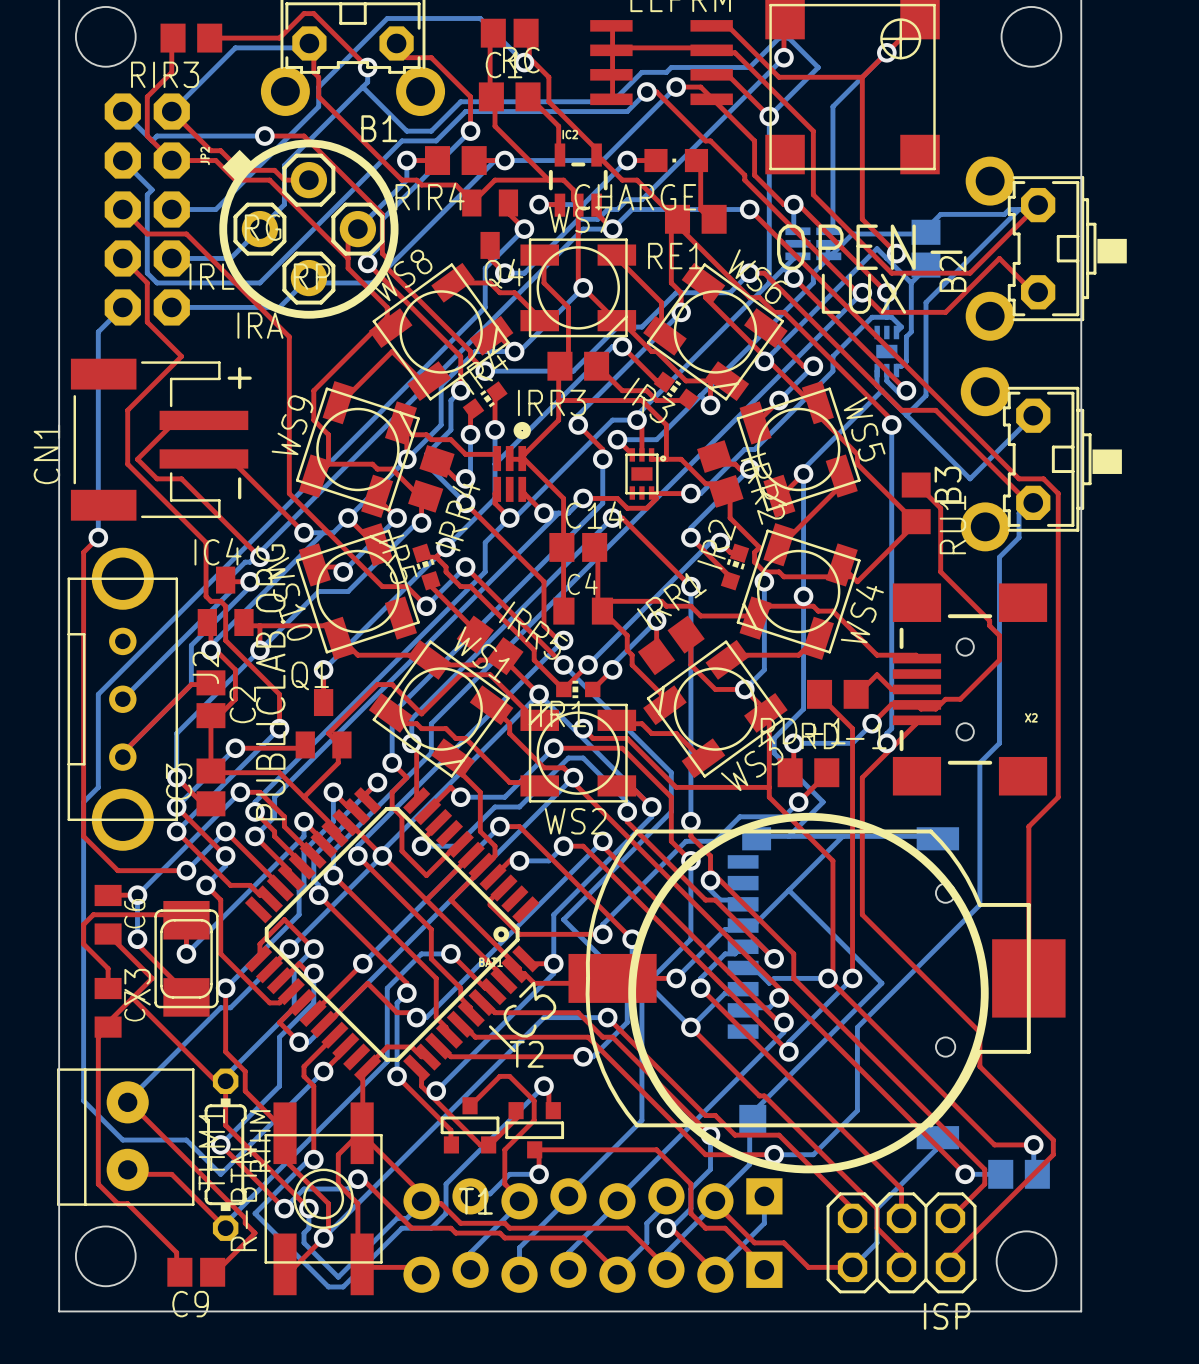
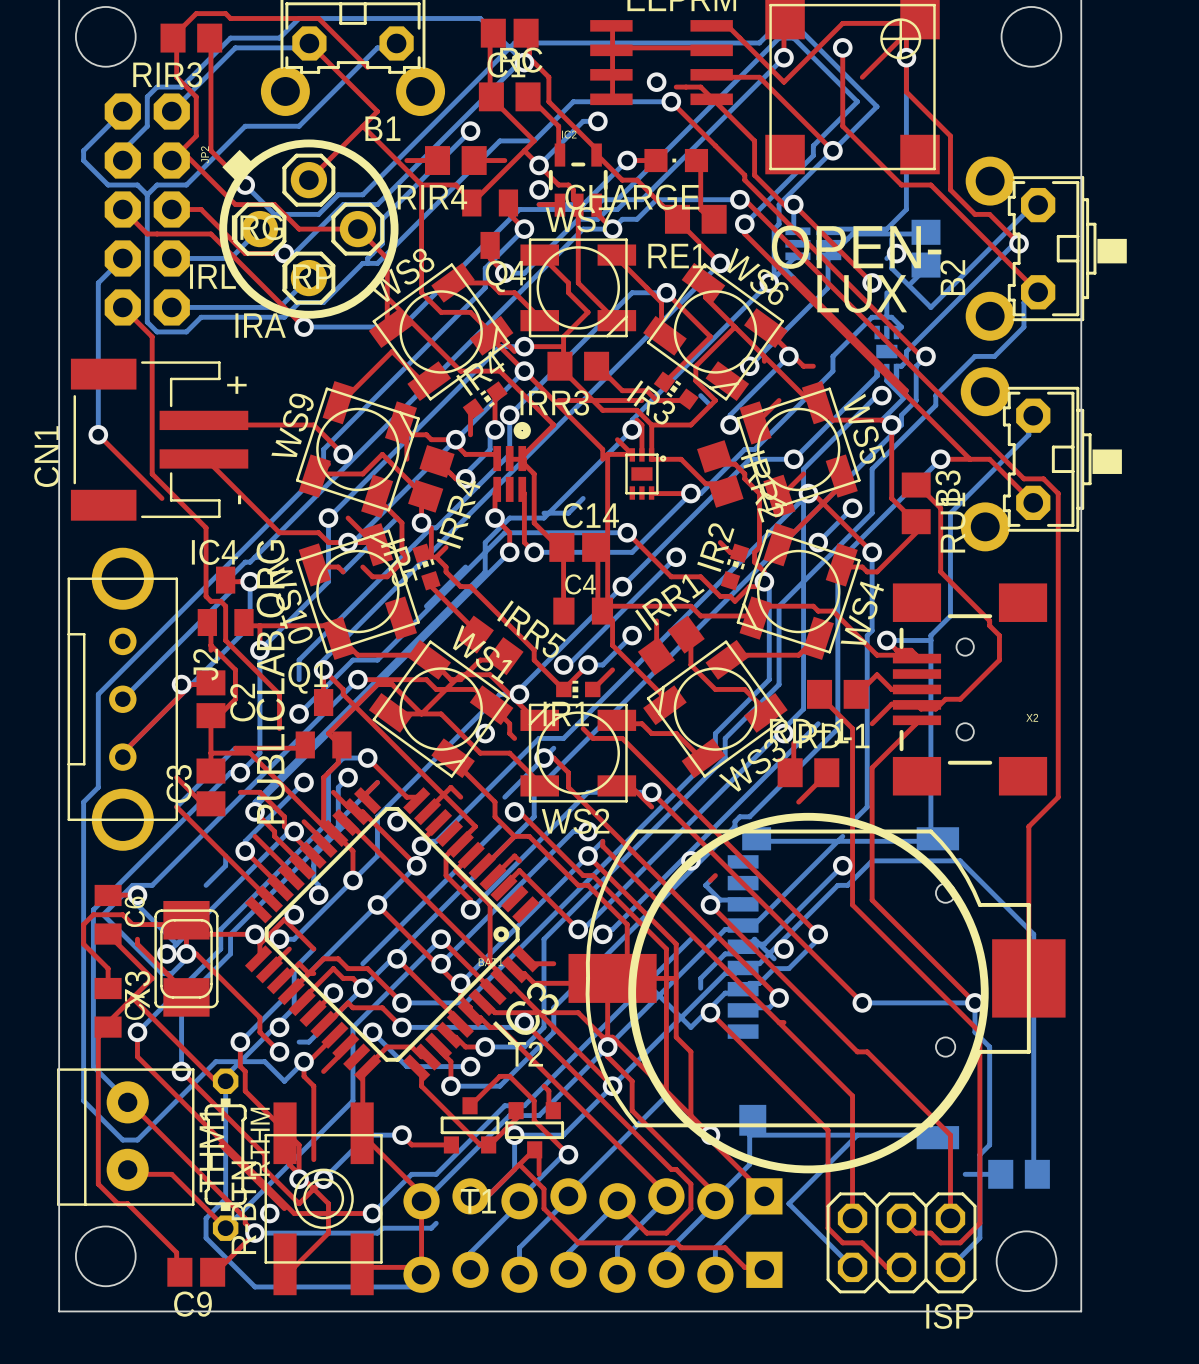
top track: (318, 18) (313, 13) (304, 13) (279, 38) (210, 38) -> (318, 18) (230, 18) (225, 13) (196, 13) (171, 38)
bottom track: (387, 18) (318, 87) (318, 106) -> (396, 43) (392, 47) (377, 47) (318, 106)
top track: none -> (920, 19) (906, 23) (906, 91) (950, 136) (950, 189) (974, 214) (989, 214) (1019, 243)
top track: (171, 38) (171, 72) (147, 96) (147, 136) (171, 160) (215, 160) (235, 180) (269, 180) (348, 258) -> none
top track: none -> (173, 38) (176, 38) (176, 77) (196, 96) (196, 136) (171, 160)
top track: none -> (210, 38) (210, 150) (245, 185)
bottom track: (788, 38) (818, 67) (769, 116) (769, 282) -> (788, 38) (793, 38) (857, 101) (813, 145) (813, 155) (744, 224)
top track: (396, 43) (397, 47) (406, 57) (431, 57) (470, 96) (470, 131) -> none
top track: (313, 47) (313, 72) (318, 77) (318, 96) (401, 180) (416, 180) -> (362, 126) (416, 180)
top track: none -> (842, 47) (842, 126) (901, 185) (930, 185) (1038, 292)
via: none -> (842, 47)
top track: (711, 50) (715, 52) (734, 52) (759, 77) -> (730, 77) (759, 77)
bottom track: (886, 52) (832, 106) (832, 229) -> (906, 57) (906, 209) (886, 229) (832, 229)
via position: (886, 52) -> (906, 57)
bottom track: none -> (519, 62) (377, 204) (343, 204) (294, 253) (284, 253)
bottom track: (367, 67) (367, 82) (284, 165) (284, 204) (274, 214) -> none
via: (367, 67) -> none
bottom track: (749, 67) (671, 67) (666, 72) (641, 72) (612, 101) -> (671, 101) (612, 101)
bottom track: none -> (749, 67) (617, 199) (602, 199) (592, 209) (519, 209) (401, 327) (304, 327)
top track: (730, 77) (769, 116) -> none
top track: (779, 77) (862, 77) (862, 219) (896, 253) -> (779, 77) (783, 82) (842, 23) (916, 23)
via: none -> (656, 82)
bottom track: (362, 87) (406, 131) (431, 131) (460, 101) (573, 101) -> none
bottom track: (676, 87) (602, 160) (495, 160) (372, 282) (313, 282) (308, 278) -> none
via: (676, 87) -> none
top track: (646, 91) (656, 91) (705, 140) (710, 140) -> (671, 101) (710, 140)
bottom track: (646, 91) (627, 111) (465, 111) (436, 140) (401, 140) (259, 282) (157, 282) (147, 273) -> (573, 101) (534, 140) (499, 140) (377, 263) (362, 263) (323, 302) (299, 302) (284, 317) (201, 317) (186, 331) (157, 331) (147, 322) (147, 273)
via: (646, 91) -> none
top track: none -> (490, 96) (534, 140) (495, 180)
top track: (495, 96) (495, 126) (548, 180) -> none
via: none -> (671, 101)
bottom track: (122, 111) (152, 140) (157, 136) (264, 136) -> (122, 111) (83, 150) (83, 160) (108, 185) (137, 185) (147, 194)
top track: (171, 111) (210, 150) (220, 150) (240, 170) (274, 170) (284, 180) (308, 180) -> (313, 47) (377, 111) (308, 180)
via: (769, 116) -> none
bottom track: none -> (597, 121) (583, 121) (539, 165)
via: none -> (597, 121)
bottom track: (299, 126) (215, 209) (171, 209) -> (299, 126) (245, 126) (186, 185) (157, 185) (152, 189)
top track: (813, 131) (813, 194) (891, 273) (970, 273) (1038, 205) -> (813, 131) (832, 150)
top track: (264, 136) (304, 136) (382, 214) (382, 253) -> (181, 150) (235, 204) (274, 204) (299, 229) (357, 229) (382, 253)
via position: (264, 136) -> (245, 185)
via: none -> (832, 150)
bottom track: (122, 160) (152, 189) -> (122, 160) (122, 150) (147, 126) (147, 96) (157, 87) (181, 87) (230, 38) (279, 38) (299, 18) (387, 18)
bottom track: (406, 160) (406, 180) (357, 229) -> none
via: (406, 160) -> none
via: (504, 160) -> none
via: none -> (539, 165)
top track: (495, 180) (563, 180) (568, 185) -> (524, 150) (558, 185) (568, 185)
bottom track: none -> (245, 185) (274, 214) (318, 214) (338, 194) (362, 194) (514, 42) (759, 42) (774, 28) (798, 28) (877, 106) (779, 204) (779, 224) (774, 229) (774, 278)
top track: none -> (421, 185) (421, 292) (441, 312) (470, 312) (490, 331) (490, 336) (578, 424)
via: none -> (739, 199)
via position: (539, 204) -> (539, 189)
top track: (783, 204) (798, 204) (886, 292) -> (783, 204) (788, 209) (798, 209) (872, 282)
bottom track: (1038, 205) (1033, 209) (1009, 209) (1004, 214) (940, 214) (926, 229) (926, 232) -> (1038, 205) (1033, 204) (930, 307) (891, 268) (891, 238)
top track: none -> (171, 209) (201, 209) (245, 253) (284, 253)
top track: (749, 209) (1019, 478) (1023, 478) -> (739, 199) (744, 199) (1023, 478)
bottom track: (749, 209) (632, 209) (622, 219) -> (739, 199) (656, 199) (637, 219) (622, 219)
via: (749, 209) -> none
bottom track: (1019, 209) (926, 302) (926, 395) (906, 415) -> none
top track: (676, 219) (671, 219) (749, 297) (759, 297) (774, 312) (783, 312) (891, 420) (891, 424) -> (676, 219) (720, 263)
top track: (677, 219) (671, 214) (671, 282) (681, 292) (681, 312) -> none
top track: none -> (744, 224) (744, 233) (970, 459)
via: none -> (744, 224)
top track: (357, 229) (348, 238) (348, 268) (387, 307) -> (387, 268) (387, 307)
top track: (186, 233) (289, 336) (289, 493) (362, 567) -> (186, 233) (210, 233) (304, 327)
via: none -> (1019, 243)
via: none -> (284, 253)
top track: (122, 258) (147, 282) (147, 322) (181, 356) (127, 410) (127, 464) -> (98, 434) (127, 464)
top track: (543, 258) (543, 282) (568, 307) (568, 361) (563, 366) -> (543, 258) (568, 282) (568, 292) (588, 312) (563, 336) (563, 366)
bottom track: (828, 258) (813, 273) (813, 282) (656, 439) (617, 439) -> (828, 258) (828, 287) (749, 366)
top track: (367, 263) (460, 356) (460, 390) -> none
via: (367, 263) -> none
bottom track: none -> (720, 263) (318, 664)
via: none -> (720, 263)
top track: (387, 268) (470, 351) (470, 356) (485, 371) -> none
top track: (749, 273) (764, 273) (901, 410) (935, 410) (1028, 503) (1033, 502) -> (940, 459) (989, 459) (1033, 502)
bottom track: (749, 273) (730, 292) (676, 292) (641, 327) (617, 327) (573, 371) (485, 371) -> none
via: (749, 273) -> none
via: (793, 278) -> none
via: none -> (769, 282)
via: none -> (872, 282)
bottom track: (485, 287) (485, 307) (323, 469) -> (485, 287) (323, 449) (323, 469)
bottom track: (583, 287) (519, 351) (475, 351) (441, 385) (441, 424) (333, 532) (304, 532) -> none
via: (583, 287) -> none
bottom track: none -> (666, 292) (632, 292) (509, 415) (509, 454) (436, 527) (431, 527) (299, 660) (299, 679)
bottom track: (862, 292) (431, 723) (431, 753) (333, 851) (333, 875) -> none
via: (862, 292) -> none
via: (886, 292) -> none
top track: (1038, 292) (1033, 292) (999, 258) (945, 312) (881, 312) (862, 292) (857, 292) -> (926, 356) (921, 356) (857, 292)
top track: none -> (387, 297) (460, 371) (499, 371) (553, 424)
bottom track: (122, 307) (98, 331) -> (122, 258) (98, 282) (98, 331)
bottom track: (681, 312) (578, 415) (578, 424) -> none
via position: (681, 312) -> (666, 292)
top track: (387, 317) (313, 390) (313, 420) (328, 434) (328, 464) -> none
top track: (616, 320) (617, 317) (651, 351) (656, 351) (686, 380) (725, 380) (727, 381) (710, 380) (710, 405) -> none
via: none -> (304, 327)
top track: none -> (734, 327) (695, 366) (695, 380) (715, 400) (690, 424) (651, 424)
top track: none -> (524, 346) (563, 346)
via: none -> (524, 346)
top track: (622, 346) (656, 380) (664, 382) -> (666, 292) (710, 336) (664, 382)
bottom track: (622, 346) (612, 346) (495, 464) -> none
via: (622, 346) -> none
via: (514, 351) -> none
bottom track: (906, 351) (906, 336) (911, 331) (911, 282) (877, 248) (764, 361) -> (906, 351) (1014, 243) (1019, 243)
via: none -> (788, 356)
via: none -> (926, 356)
via position: (764, 361) -> (749, 366)
top track: (558, 366) (558, 420) (553, 424) -> (558, 366) (602, 410) (637, 410) (651, 424)
bottom track: (813, 366) (779, 400) -> (852, 508) (818, 542)
via: (813, 366) -> none
via: (485, 371) -> none
bottom track: none -> (524, 371) (352, 542) (348, 542)
via: none -> (524, 371)
bottom track: none -> (896, 371) (896, 385) (906, 395) (881, 420)
bottom track: (877, 376) (877, 385) (970, 478) (1028, 420) -> (877, 376) (793, 459) (749, 459) (514, 694)
bottom track: (460, 390) (450, 400) (450, 429) (426, 454) (426, 464) (465, 503) -> none
via: (460, 390) -> none
via: (906, 390) -> none
via: none -> (881, 395)
top track: (641, 400) (666, 424) (666, 459) -> none
via: (779, 400) -> none
via: (710, 405) -> none
top track: (818, 405) (818, 415) (857, 454) (857, 464) (891, 498) -> (818, 405) (832, 420) (881, 420) (891, 429) (891, 498)
via: none -> (509, 415)
bottom track: (637, 415) (637, 420) (612, 420) (514, 518) -> (637, 415) (632, 420) (632, 429) (543, 518) (514, 518)
top track: (203, 420) (201, 424) (171, 424) (137, 459) (152, 473) -> (122, 307) (152, 336) (152, 473)
top track: none -> (203, 420) (206, 424) (313, 424) (343, 454)
via: (637, 420) -> none
via: (578, 424) -> none
top track: none -> (651, 424) (651, 454)
via: none -> (730, 424)
bottom track: (891, 424) (891, 728) (886, 733) (886, 743) -> none
bottom track: none -> (490, 429) (490, 449) (465, 473)
bottom track: (495, 429) (495, 498) (323, 669) -> none
via: none -> (632, 429)
bottom track: (98, 434) (98, 537) -> none
via: none -> (98, 434)
bottom track: (470, 434) (470, 473) (465, 478) -> none
via position: (470, 434) -> (455, 439)
via: (617, 439) -> none
via: none -> (343, 454)
top track: (206, 459) (230, 459) (304, 532) -> (206, 459) (279, 532) (318, 532) (328, 542) (372, 542)
via: (406, 459) -> none
top track: (524, 459) (563, 498) (563, 547) -> (524, 459) (524, 464) (534, 473) (534, 522) (558, 547) (561, 547)
bottom track: (602, 459) (602, 503) (392, 713) (392, 762) -> none
via: (602, 459) -> none
via: none -> (793, 459)
via: none -> (940, 459)
top track: (328, 464) (372, 464) (377, 469) (392, 469) (416, 493) (421, 493) -> (318, 473) (362, 473) (382, 454) (421, 493)
bottom track: (749, 469) (690, 527) (690, 537) -> (788, 356) (730, 415) (730, 424)
via: (749, 469) -> none
via: (803, 473) -> none
top track: (157, 478) (181, 478) (259, 557) -> none
bottom track: none -> (695, 488) (632, 552) (534, 552)
top track: (725, 491) (730, 493) (730, 518) (759, 547) -> (739, 469) (744, 473) (744, 478) (759, 493) (759, 547)
top track: (524, 493) (543, 513) -> (524, 493) (524, 542) (534, 552)
top track: (651, 493) (656, 498) (646, 508) (627, 508) (617, 498) (583, 498) -> none
top track: none -> (808, 493) (813, 493) (872, 552)
bottom track: none -> (808, 493) (563, 738) (539, 738) (436, 841) (416, 841)
via: none -> (808, 493)
top track: (161, 498) (206, 542) -> (157, 478) (206, 527) (206, 542)
via: (583, 498) -> none
bottom track: (1033, 502) (1028, 503) (1019, 513) (1019, 537) (999, 557) (999, 743) (979, 762) (979, 904) (857, 1027) (857, 1110) (813, 1154) (774, 1154) -> none
top track: (465, 503) (543, 581) (543, 625) (558, 640) (563, 640) -> none
via: (465, 503) -> none
top track: (495, 503) (509, 518) -> (495, 503) (495, 518) (509, 532) (509, 552)
via: none -> (852, 508)
via: (543, 513) -> none
bottom track: (558, 513) (274, 797) (274, 816) (255, 836) -> none
via: none -> (328, 518)
via: (348, 518) -> none
via: (397, 518) -> none
via position: (509, 518) -> (495, 518)
top track: (612, 518) (622, 518) (690, 586) -> none
bottom track: (612, 518) (411, 718) (411, 743) -> none
via position: (612, 518) -> (627, 532)
top track: (911, 518) (916, 522) (857, 581) (842, 567) -> (916, 522) (921, 527) (877, 571) (867, 571) (862, 567) (842, 567)
bottom track: (421, 522) (416, 522) (348, 591) (318, 591) -> (524, 346) (499, 346) (328, 518) (328, 581) (318, 591)
top track: none -> (431, 527) (431, 557) (421, 553)
via: (304, 532) -> none
bottom track: (323, 532) (210, 645) (210, 650) -> none
top track: none -> (627, 532) (671, 576) (700, 576) (720, 596) (730, 596) (734, 601) (749, 586) (769, 586)
bottom track: none -> (627, 532) (504, 532) (377, 660) (352, 660) (299, 713)
top track: (98, 537) (83, 552) (83, 836) (117, 870) (186, 870) -> none
via: (98, 537) -> none
top track: (690, 537) (730, 576) (730, 580) -> none
via: (690, 537) -> none
via: none -> (348, 542)
bottom track: (720, 542) (710, 542) (588, 664) -> none
via: (720, 542) -> none
via: none -> (818, 542)
via: (446, 547) -> none
bottom track: none -> (509, 552) (250, 811)
via: none -> (509, 552)
via: none -> (534, 552)
bottom track: none -> (872, 552) (872, 630) (867, 635) (867, 807) (852, 821)
via: none -> (872, 552)
via: (259, 557) -> none
bottom track: none -> (676, 557) (568, 664)
via: none -> (676, 557)
top track: (465, 567) (563, 664) -> none
via: (465, 567) -> none
via: (343, 571) -> none
top track: (372, 576) (382, 586) (406, 586) (426, 606) -> (372, 576) (387, 576) (406, 557) (401, 552) (401, 522) (397, 518)
top track: (852, 576) (783, 576) (779, 571) (764, 571) (764, 581) -> none
bottom track: (250, 581) (250, 586) (191, 645) (191, 684) -> (250, 591) (250, 625) (191, 684)
bottom track: (764, 581) (764, 669) (744, 689) -> none
via: none -> (622, 586)
bottom track: (690, 586) (690, 821) -> none
via: (690, 586) -> none
via: (803, 596) -> none
via: (426, 606) -> none
top track: (666, 606) (661, 601) (597, 601) (602, 611) -> (666, 606) (597, 606) (602, 611) (607, 606) (607, 454) (632, 454)
top track: (612, 620) (627, 635) (627, 650) (632, 655) (632, 664) -> (612, 620) (612, 645) (632, 664)
bottom track: (656, 620) (612, 664) (612, 669) -> none
via: (656, 620) -> none
bottom track: none -> (632, 635) (602, 664) (592, 664)
via: none -> (632, 635)
bottom track: (563, 640) (357, 846) (357, 855) -> none
via: (563, 640) -> none
top track: none -> (886, 640) (896, 650) (911, 650) (916, 655)
via: none -> (886, 640)
via: (210, 650) -> none
bottom track: (259, 650) (176, 733) (176, 777) -> (259, 650) (259, 753) (240, 772) (230, 772) (93, 909) (93, 1066) (127, 1100)
top track: (504, 656) (509, 660) (509, 664) (539, 694) -> none
top track: none -> (318, 664) (343, 689) (343, 694) (475, 826) (460, 841) (460, 844)
top track: (436, 664) (475, 664) -> (436, 664) (450, 679) (460, 679) (475, 664)
bottom track: (563, 664) (671, 772) (671, 811) -> (1038, 292) (1033, 292) (1023, 302) (1023, 327) (994, 356) (974, 356) (935, 395) (935, 405) (872, 469) (872, 513) (779, 606) (779, 684) (725, 738) (725, 758) (671, 811)
via: (612, 669) -> none
top track: none -> (357, 679) (426, 679) (436, 689) (475, 689) (491, 705)
bottom track: none -> (357, 679) (152, 885) (132, 885) (103, 914) (161, 973) (171, 973) (191, 953)
via: none -> (357, 679)
via: none -> (181, 684)
via: (744, 689) -> none
bottom track: none -> (519, 694) (499, 694) (377, 816) (377, 855) (294, 939) (279, 939)
via position: (539, 694) -> (519, 694)
top track: (765, 712) (769, 713) (769, 797) (832, 860) (832, 983) (994, 1144) (1033, 1144) -> none
top track: (392, 713) (401, 723) (416, 723) (421, 728) (446, 728) (455, 738) (465, 738) -> (392, 713) (441, 713) (465, 738)
bottom track: none -> (818, 723) (612, 929) (607, 929)
bottom track: (872, 723) (852, 743) (793, 743) -> none
via: (872, 723) -> none
bottom track: (279, 728) (176, 831) -> none
via position: (279, 728) -> (299, 713)
via: (583, 728) -> none
via: none -> (485, 733)
top track: (514, 738) (543, 767) (563, 767) -> (543, 758) (553, 758) (563, 767)
top track: (622, 738) (627, 738) (676, 787) (769, 787) -> (622, 738) (818, 934)
bottom track: (774, 738) (774, 753) (823, 802) (788, 836) -> (774, 738) (583, 929) (578, 929)
top track: (411, 743) (416, 748) (416, 797) -> (367, 758) (406, 797) (416, 797)
via: (411, 743) -> none
via position: (793, 743) -> (783, 733)
via: (886, 743) -> none
via: (235, 748) -> none
top track: (553, 748) (622, 748) (671, 797) (671, 841) (690, 860) -> none
via position: (553, 748) -> (543, 758)
top track: (480, 753) (509, 782) (539, 782) -> (480, 753) (509, 753) (539, 782)
bottom track: none -> (367, 758) (343, 758) (328, 772) (328, 821) (220, 929) (220, 949) (137, 1032)
via: none -> (367, 758)
bottom track: (568, 758) (583, 758) (632, 807) (627, 811) -> (568, 758) (901, 424) (901, 415) (916, 400) (916, 366) (926, 356)
top track: (392, 762) (406, 777) (392, 792) (392, 807) (401, 816) (401, 851) -> (356, 811) (362, 811) (401, 851)
via: (392, 762) -> none
top track: (455, 762) (455, 767) (480, 792) (480, 831) (495, 846) (495, 855) -> (455, 762) (495, 802) (495, 816) (514, 836)
top track: (872, 767) (862, 777) (862, 914) -> (872, 767) (872, 900) (974, 1002)
top track: (210, 771) (210, 772) (279, 772) (338, 831) (334, 833) -> (210, 753) (250, 753) (333, 836) (334, 833)
via: none -> (240, 772)
top track: (568, 772) (573, 777) (573, 782) (965, 1174) -> (568, 772) (568, 787) (774, 993)
via: (176, 777) -> none
top track: (323, 777) (304, 797) -> (323, 777) (323, 821) (334, 833)
bottom track: none -> (348, 777) (338, 787) (338, 826) (230, 934) (230, 953) (181, 1002) (181, 1071)
via: none -> (348, 777)
bottom track: (573, 777) (534, 816) -> (534, 792) (534, 816)
via: (573, 777) -> none
bottom track: none -> (304, 782) (245, 841) (245, 851)
via: none -> (304, 782)
via: (377, 782) -> none
bottom track: (240, 792) (137, 895) (137, 939) -> none
via: (240, 792) -> none
bottom track: (333, 792) (333, 821) (304, 851) (304, 885) (299, 890) (299, 914) (225, 988) -> none
via: (333, 792) -> none
bottom track: (534, 792) (519, 807) (495, 807) (455, 846) (421, 846) -> none
top track: none -> (651, 792) (862, 1002)
bottom track: none -> (651, 792) (588, 792) (470, 909)
bottom track: (460, 797) (504, 797) -> (886, 640) (930, 640)
via: (460, 797) -> none
bottom track: (798, 802) (783, 816) (749, 816) -> (940, 459) (837, 562) (837, 728) (749, 816)
via: (798, 802) -> none
via: (176, 807) -> none
via position: (651, 807) -> (651, 792)
top track: none -> (514, 811) (519, 811) (583, 875) (592, 875) (666, 949) (666, 1095)
top track: (627, 811) (627, 821) (705, 900) (715, 900) (774, 958) -> none
via: (627, 811) -> none
bottom track: (651, 816) (651, 807) (539, 694) (382, 851) (382, 855) (230, 1007) (220, 1007) (127, 1100) -> (651, 816) (715, 753) (715, 733) (769, 679) (769, 586)
bottom track: (304, 821) (304, 836) (186, 953) -> none
via position: (304, 821) -> (294, 831)
via: none -> (397, 821)
top track: (690, 821) (690, 836) (710, 855) (710, 870) (793, 953) (793, 978) (867, 1051) -> (710, 904) (857, 1051) (867, 1051)
via: (690, 821) -> none
bottom track: (734, 821) (715, 841) (686, 841) (602, 924) (602, 934) -> (734, 821) (734, 826) (553, 1007) (553, 1032) (499, 1086) (450, 1086)
top track: (499, 826) (519, 826) (529, 836) -> (514, 836) (529, 836)
via position: (499, 826) -> (514, 811)
top track: (176, 831) (230, 885) (250, 885) (259, 895) (264, 895) -> (225, 855) (264, 895)
via: (176, 831) -> none
top track: (225, 831) (245, 851) -> none
bottom track: (225, 831) (186, 870) -> none
via: (225, 831) -> none
bottom track: none -> (294, 831) (289, 831) (166, 953)
bottom track: none -> (588, 831) (573, 831) (441, 963)
via: none -> (588, 831)
top track: none -> (334, 833) (352, 851) (352, 880)
via: (255, 836) -> none
top track: none -> (514, 836) (495, 855)
bottom track: (756, 838) (759, 836) (935, 836) (937, 838) -> (756, 838) (759, 841) (935, 841) (937, 838) (930, 841) (930, 635) (950, 616) (950, 513) (1028, 434) (1028, 420)
via: (602, 841) -> none
top track: (563, 846) (583, 846) (788, 1051) -> none
bottom track: (563, 846) (548, 860) (519, 860) -> none
via: (563, 846) -> none
via: none -> (245, 851)
via: (225, 855) -> none
top track: (357, 855) (431, 929) (431, 958) -> (377, 904) (431, 958)
via: (357, 855) -> none
via: (382, 855) -> none
top track: (446, 855) (426, 875) (416, 865) -> (446, 855) (446, 875) (470, 900) (470, 909)
top track: none -> (588, 855) (676, 944) (676, 1037) (690, 1051) (690, 1120) (764, 1193) (764, 1196)
via: none -> (588, 855)
via: (519, 860) -> none
bottom track: (690, 860) (690, 939) -> none
bottom track: none -> (416, 865) (240, 1042)
via: none -> (416, 865)
bottom track: none -> (842, 865) (764, 944) (744, 944) (743, 946)
via: none -> (842, 865)
top track: (482, 866) (480, 870) (450, 900) (519, 968) (514, 969) -> none
via: (186, 870) -> none
top track: (455, 870) (426, 900) -> (455, 870) (490, 904) (490, 963)
top track: (333, 875) (436, 978) (436, 1017) (446, 1027) (446, 1032) (449, 1035) -> (485, 1046) (465, 1046) (455, 1037) (449, 1035)
via: (333, 875) -> none
via: none -> (352, 880)
via position: (710, 880) -> (710, 904)
top track: (206, 885) (220, 900) (220, 953) (269, 1002) (279, 1002) (291, 991) -> (401, 1002) (367, 968) (348, 968) (338, 958) (323, 958) (291, 991)
via: (206, 885) -> none
top track: (578, 885) (632, 939) -> (578, 885) (588, 885) (627, 924) (627, 963) (612, 978)
top track: (503, 887) (490, 900) (490, 904) (519, 934) (602, 934) -> (503, 887) (519, 870) (578, 929)
bottom track: (788, 890) (881, 983) (749, 1115) (752, 1120) -> (937, 1137) (935, 1135) (749, 1135) (752, 1120)
top track: (318, 895) (406, 983) (406, 993) -> none
bottom track: none -> (137, 904) (176, 944)
via: none -> (377, 904)
top track: (852, 904) (852, 978) -> (852, 904) (862, 914)
via: none -> (470, 909)
top track: (122, 914) (181, 914) (186, 920) -> (122, 914) (132, 924) (186, 924) (196, 934) (255, 934)
via: none -> (294, 914)
bottom track: (553, 914) (553, 973) (436, 1091) -> (553, 914) (465, 1002) (401, 1002)
bottom track: (563, 919) (627, 983) (627, 1022) (592, 1056) (583, 1056) -> (563, 919) (543, 939) (543, 1027) (524, 1046) (485, 1046)
via: none -> (578, 929)
via: none -> (255, 934)
bottom track: none -> (818, 934) (818, 939) (788, 968) (774, 968) (759, 983) (749, 983) (743, 989)
via: none -> (818, 934)
via position: (137, 939) -> (166, 953)
via: none -> (441, 939)
bottom track: (632, 939) (632, 973) (641, 983) (641, 1120) -> (666, 1095) (641, 1120)
via: (632, 939) -> none
via position: (289, 949) -> (279, 939)
via: (313, 949) -> none
top track: none -> (191, 953) (196, 953) (259, 1017) (259, 1032) (279, 1051)
top track: (450, 953) (485, 988) (490, 988) -> (441, 939) (490, 988)
bottom track: (450, 953) (421, 953) (387, 988) (387, 1061) (225, 1223) (225, 1228) -> (441, 939) (352, 1027) (352, 1100) (225, 1228)
via: (450, 953) -> none
top track: none -> (397, 958) (455, 1017) (455, 1022) (460, 1024)
via: none -> (397, 958)
via position: (774, 958) -> (783, 949)
top track: (362, 963) (333, 993) -> none
via: (362, 963) -> none
via: none -> (441, 963)
via: (553, 963) -> none
bottom track: (743, 967) (754, 968) (769, 983) (774, 978) (828, 978) -> none
bottom track: (313, 973) (313, 1002) (279, 1037) (279, 1086) (220, 1144) -> none
via: (313, 973) -> none
bottom track: none -> (651, 978) (543, 1086)
via: (676, 978) -> none
via: (828, 978) -> none
bottom track: (852, 978) (788, 1042) (788, 1051) -> none
via: (852, 978) -> none
top track: none -> (503, 980) (504, 983) (509, 983) (612, 1086)
bottom track: (460, 983) (426, 1017) (416, 1017) -> none
via: none -> (460, 983)
top track: (225, 988) (225, 1051) (240, 1066) -> (240, 1042) (240, 1066)
via: (225, 988) -> none
via: none -> (362, 988)
top track: (700, 988) (901, 1189) (901, 1218) -> none
via: (700, 988) -> none
via: none -> (333, 993)
bottom track: (406, 993) (397, 1002) (397, 1076) -> none
via: (406, 993) -> none
top track: (302, 1002) (299, 1002) (279, 1022) (299, 1042) -> (302, 1002) (304, 998) (333, 968) (343, 978) (352, 978) (362, 988)
top track: (348, 1002) (367, 983) (397, 1012) (411, 1012) (416, 1017) -> (348, 1002) (352, 1007) (382, 1007) (401, 1027)
via: none -> (401, 1002)
bottom track: none -> (862, 1002) (974, 1002) (974, 1032) (989, 1046) (989, 1144) (979, 1154) (979, 1237) (950, 1267)
via: none -> (862, 1002)
via: none -> (974, 1002)
via: none -> (710, 1012)
top track: none -> (471, 1013) (475, 1017) (480, 1017) (490, 1027) (499, 1027) (666, 1193) (666, 1196)
via: (416, 1017) -> none
top track: (607, 1017) (705, 1115) (715, 1115) (734, 1135) (779, 1135) (852, 1208) -> (779, 1022) (852, 1095) (852, 1208)
bottom track: (607, 1017) (543, 1017) (323, 1237) -> none
via: (607, 1017) -> none
bottom track: none -> (524, 1022) (519, 1027) (401, 1027)
via: none -> (524, 1022)
bottom track: (783, 1022) (783, 1032) (617, 1198) (617, 1201) -> none
via: (783, 1022) -> none
top track: (460, 1024) (460, 1027) (465, 1027) (475, 1037) (588, 1037) (607, 1056) -> (607, 983) (607, 1056)
via: none -> (279, 1027)
via: none -> (401, 1027)
top track: (690, 1027) (759, 1095) (764, 1095) (877, 1208) (877, 1228) (901, 1252) (901, 1267) -> (710, 1012) (828, 1130) (828, 1228) (842, 1242) (862, 1242) (886, 1267) (901, 1267)
via: (690, 1027) -> none
top track: none -> (137, 1032) (137, 1056) (294, 1213) (372, 1213)
via: none -> (137, 1032)
bottom track: none -> (372, 1032) (406, 1066) (470, 1066)
via: none -> (372, 1032)
via: none -> (240, 1042)
via: (299, 1042) -> none
top track: (441, 1046) (450, 1056) (583, 1056) -> (441, 1046) (441, 1051) (450, 1061) (450, 1086)
via: none -> (485, 1046)
via: none -> (607, 1046)
via: none -> (279, 1051)
via: (788, 1051) -> none
via: (583, 1056) -> none
via: none -> (304, 1061)
via: none -> (470, 1066)
top track: (979, 1066) (1053, 1140) (1053, 1154) (945, 1262) (950, 1267) -> (979, 1066) (979, 1223) (960, 1242) (940, 1242) (930, 1233) (916, 1233) (901, 1218)
top track: none -> (181, 1071) (264, 1154) (264, 1169) (299, 1203) (323, 1179)
via: none -> (181, 1071)
bottom track: (323, 1071) (220, 1174) (186, 1140) (137, 1140) -> (304, 1061) (284, 1081) (264, 1061) (215, 1061) (137, 1140)
via: (323, 1071) -> none
top track: (397, 1076) (450, 1130) (450, 1144) -> (401, 1135) (411, 1144) (450, 1144)
via: (397, 1076) -> none
top track: (225, 1081) (225, 1125) (308, 1208) -> none
top track: (632, 1081) (705, 1154) (774, 1154) -> (632, 1081) (632, 1110) (715, 1193) (715, 1201)
via: (543, 1086) -> none
via: none -> (612, 1086)
via position: (436, 1091) -> (450, 1086)
bottom track: (524, 1105) (446, 1184) (446, 1213) (436, 1223) -> (524, 1105) (504, 1105) (436, 1174) (411, 1174) (372, 1213)
top track: (534, 1120) (504, 1149) (504, 1184) (519, 1198) (519, 1201) -> (534, 1120) (568, 1154)
top track: (362, 1133) (338, 1154) (338, 1184) (357, 1203) (357, 1262) (362, 1264) -> none
top track: none -> (289, 1135) (299, 1144) (299, 1179)
bottom track: none -> (401, 1135) (367, 1135) (323, 1179)
via: none -> (401, 1135)
via: none -> (514, 1135)
bottom track: (710, 1135) (710, 1169) (690, 1189) (690, 1208) (671, 1228) (666, 1228) -> none
top track: (950, 1135) (984, 1169) (984, 1184) (950, 1218) -> (950, 1135) (950, 1218)
bottom track: (937, 1137) (935, 1140) (935, 1149) (877, 1208) (877, 1242) (852, 1267) -> (857, 1135) (788, 1203) (852, 1267)
via: (220, 1144) -> none
via: (1033, 1144) -> none
top track: (534, 1149) (656, 1149) (676, 1169) -> (524, 1022) (671, 1169) (676, 1169)
top track: none -> (534, 1149) (480, 1203) (470, 1193) (470, 1196)
bottom track: none -> (568, 1154) (563, 1154) (519, 1198) (519, 1201)
via: none -> (568, 1154)
via: (774, 1154) -> none
bottom track: (313, 1159) (308, 1159) (255, 1213) (328, 1286) -> (225, 1081) (225, 1198) (206, 1218) (206, 1237) (255, 1286) (328, 1286)
via: (313, 1159) -> none
top track: none -> (519, 1164) (543, 1189) (543, 1208) (578, 1242) (676, 1242) (681, 1247) (725, 1247) (744, 1267) (764, 1267)
bottom track: (509, 1174) (539, 1174) -> (509, 1174) (514, 1169) (514, 1135) (563, 1135) (725, 973) (734, 973) (743, 967) (744, 963) (759, 963) (837, 885) (847, 885) (872, 860) (960, 860) (1033, 934) (1033, 1144)
via: (539, 1174) -> none
via: (965, 1174) -> none
via: none -> (299, 1179)
via: none -> (323, 1179)
top track: (357, 1179) (362, 1179) (411, 1228) (450, 1228) (455, 1233) (499, 1233) (504, 1237) (583, 1237) (617, 1272) (617, 1274) -> none
bottom track: (357, 1179) (348, 1189) (304, 1189) (284, 1208) -> none
via: (357, 1179) -> none
bottom track: (666, 1198) (666, 1203) (646, 1223) (646, 1242) (617, 1272) -> (666, 1198) (617, 1247) (617, 1272)
bottom track: (764, 1198) (764, 1223) (715, 1272) -> (764, 1198) (715, 1247) (715, 1272)
bottom track: (421, 1201) (421, 1203) (406, 1218) (397, 1218) (338, 1277) (304, 1242) (304, 1233) (308, 1228) (308, 1208) -> (421, 1201) (421, 1198) (426, 1198) (509, 1115) (539, 1115) (676, 978)
top track: (715, 1201) (715, 1203) (754, 1242) (783, 1242) (808, 1267) (852, 1267) -> none
top track: (421, 1203) (441, 1203) (460, 1223) (504, 1223) (509, 1228) (627, 1228) (666, 1267) (666, 1269) -> (421, 1203) (421, 1272)
via position: (284, 1208) -> (269, 1213)
via: (308, 1208) -> none
top track: (690, 1208) (690, 1213) (705, 1228) (725, 1228) (764, 1267) -> (690, 1208) (666, 1233) (646, 1233) (617, 1203) (617, 1201)
via: none -> (372, 1213)
bottom track: (401, 1228) (343, 1286) -> (421, 1274) (421, 1277) (411, 1286) (343, 1286)
bottom track: none -> (401, 1228) (382, 1228) (377, 1233) (255, 1233)
top track: (666, 1228) (671, 1228) (715, 1272) (715, 1274) -> none
via: (666, 1228) -> none
via: none -> (255, 1233)
via: (323, 1237) -> none

